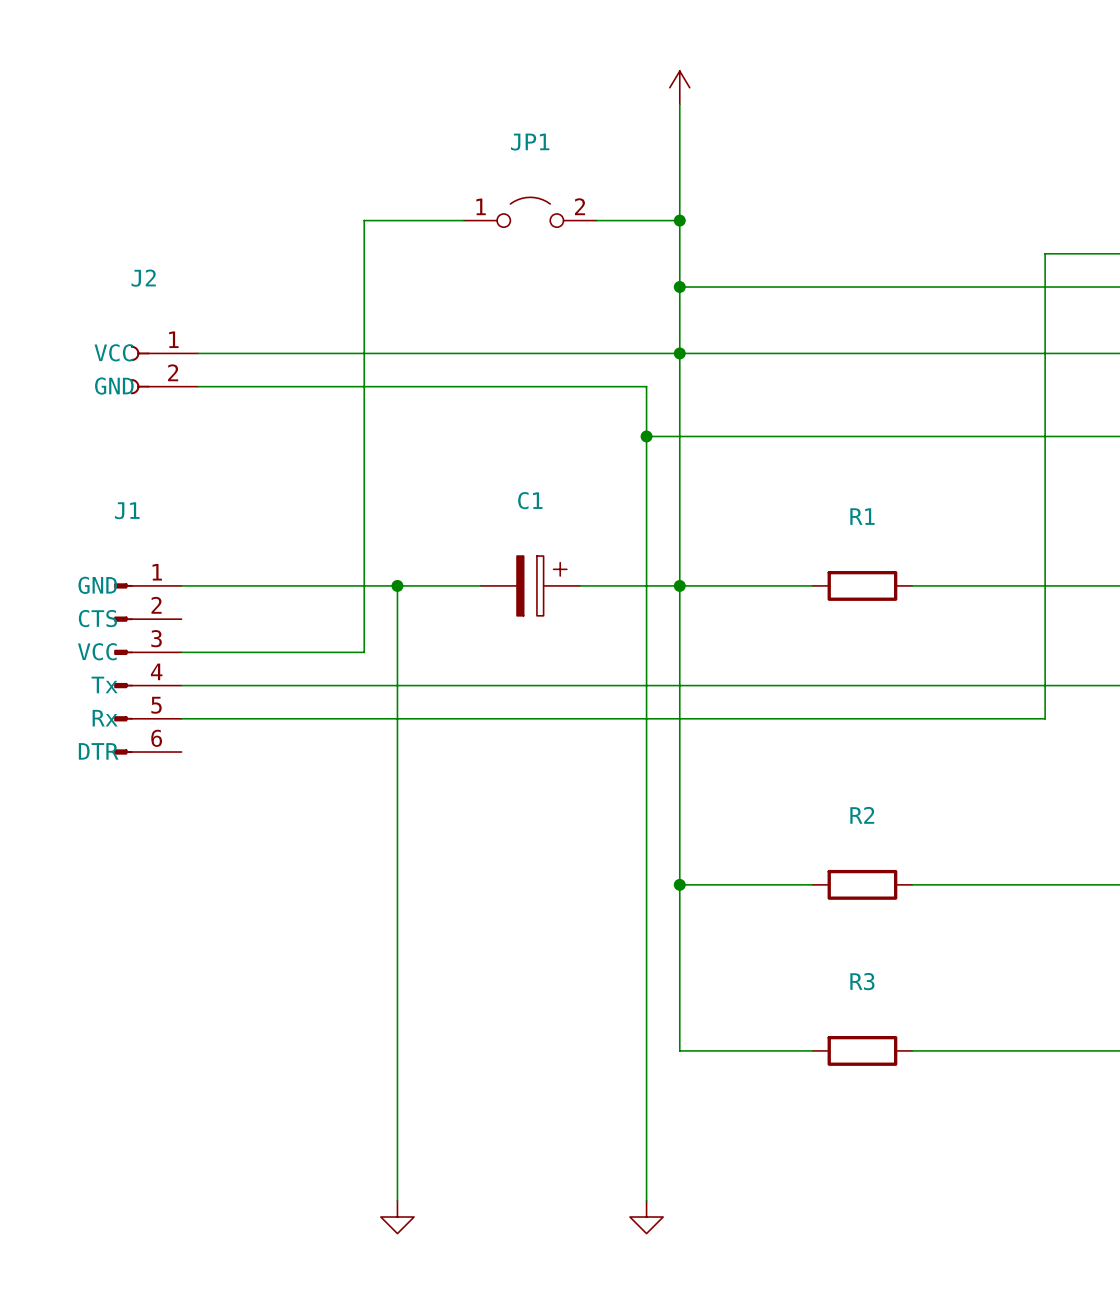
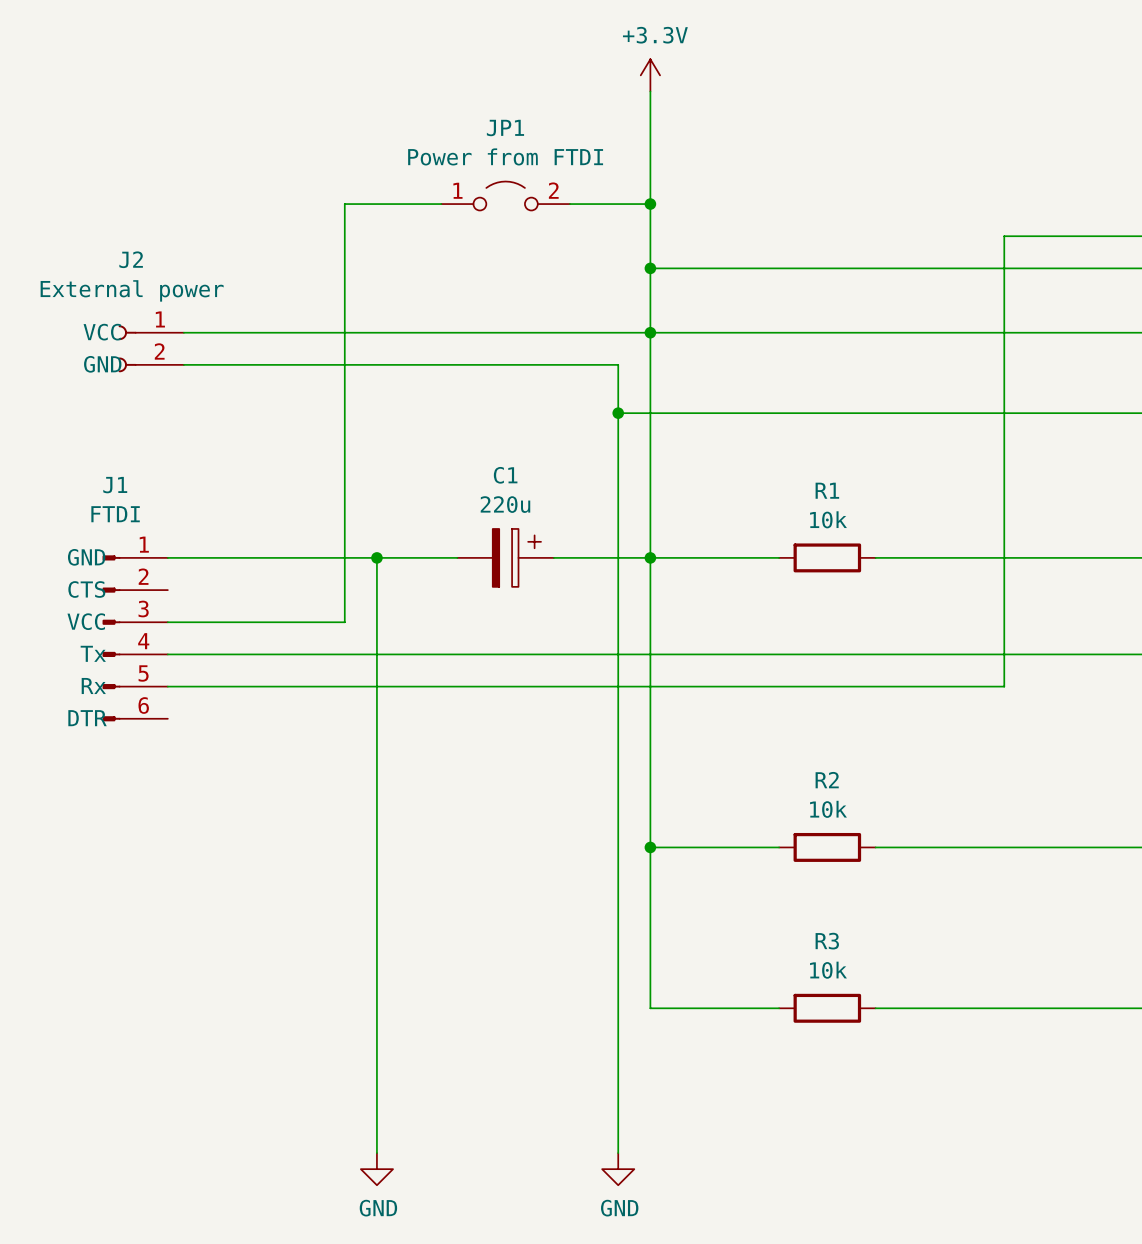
power symbol text: none -> +3.3V (655, 35)
JP1 value: none -> Power from FTDI (505, 156)
J2 value: none -> External power (132, 290)
C1 value: none -> 220u (505, 504)
J1 value: none -> FTDI (115, 514)
R1 value: none -> 10k (828, 519)
R2 value: none -> 10k (828, 809)
R3 value: none -> 10k (828, 970)
power symbol text: none -> GND (378, 1208)
power symbol text: none -> GND (619, 1208)

